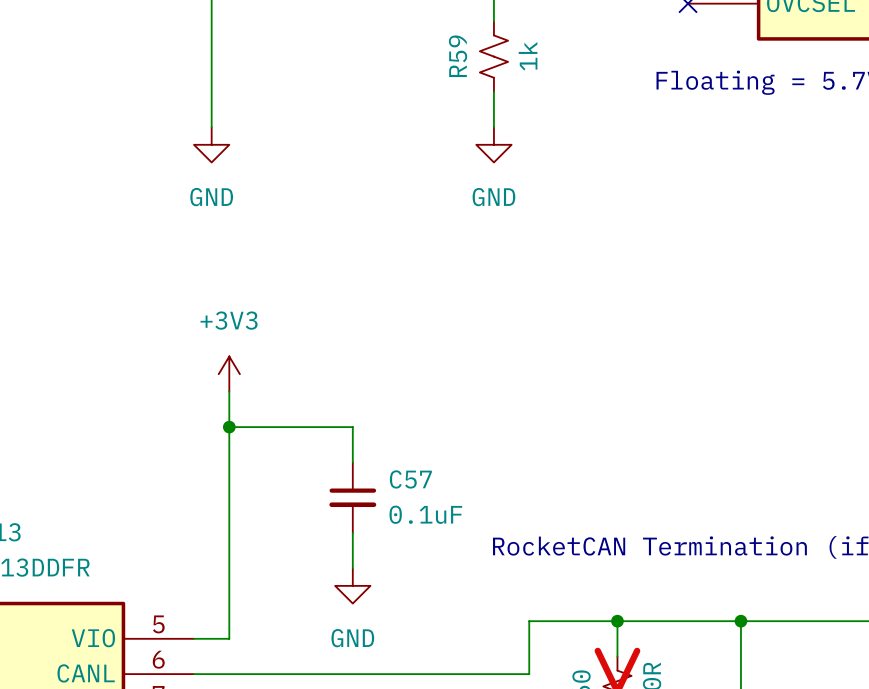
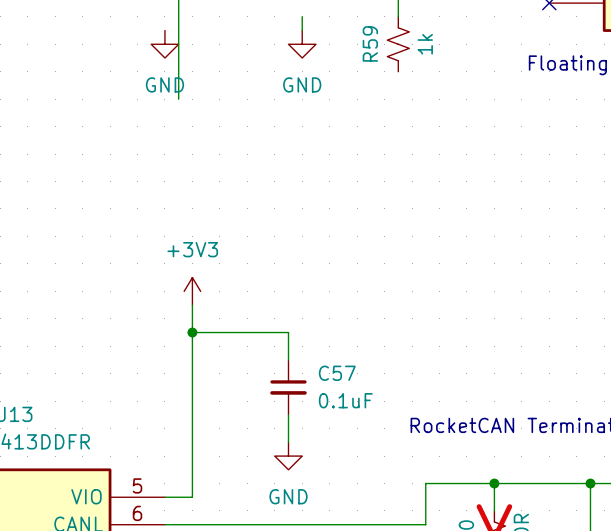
wire: none -> (302, 16) (302, 30)
power symbol: none -> GND (302, 44)
wire: (493, 91) (493, 127) -> none
power symbol position: GND (211, 144) -> GND (164, 44)
power symbol: GND (493, 144) -> none

